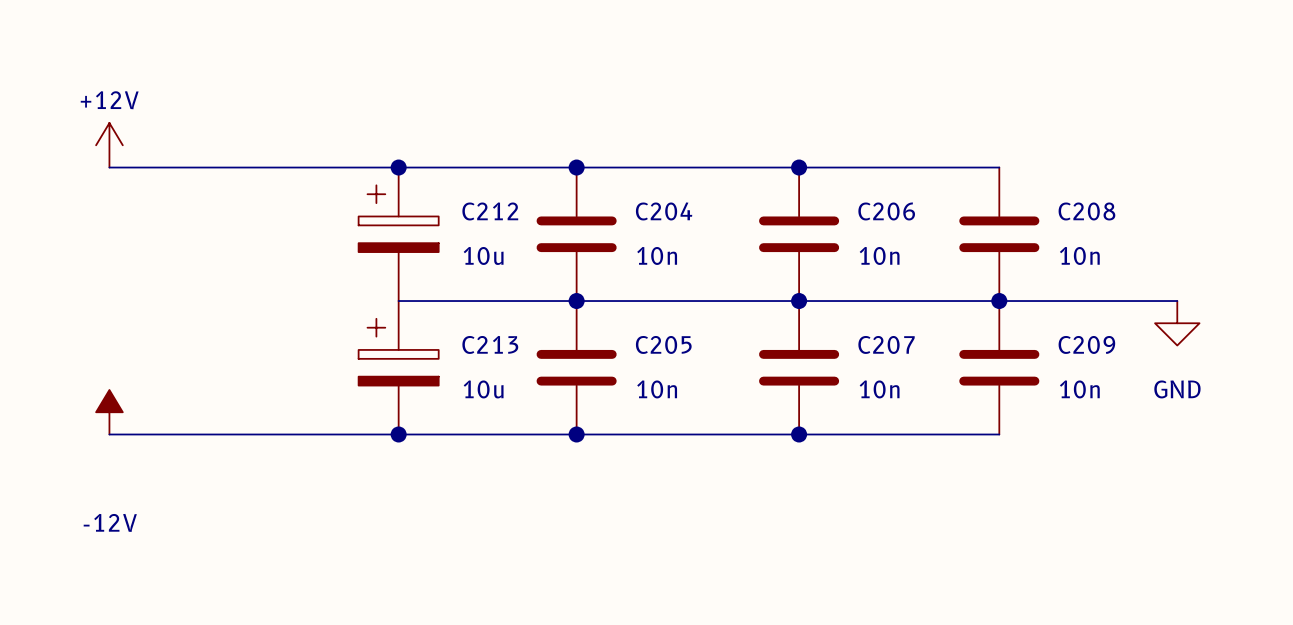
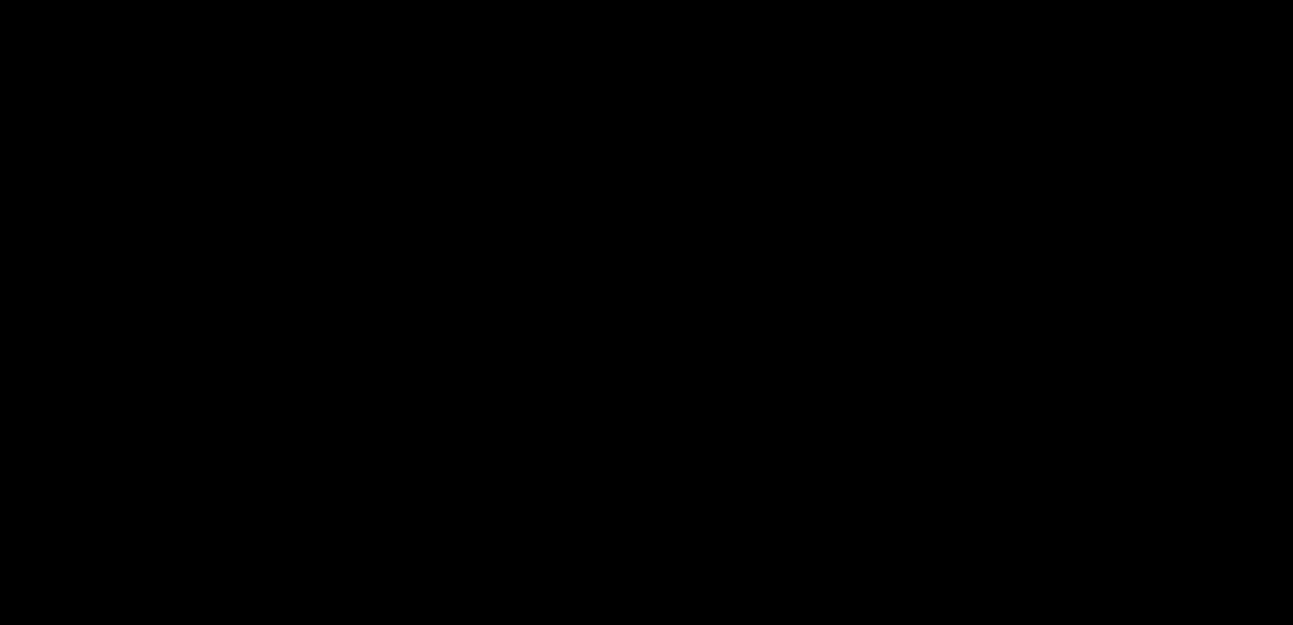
power symbol: +12V (109, 145) -> none
wire: (109, 167) (999, 167) -> none
junction: (398, 167) -> none
junction: (576, 167) -> none
junction: (799, 167) -> none
C212: 10u (398, 234) -> none
C204: 10n (576, 234) -> none
C206: 10n (799, 234) -> none
C208: 10n (999, 234) -> none
wire: (398, 301) (1177, 301) -> none
junction: (576, 301) -> none
junction: (799, 301) -> none
junction: (999, 301) -> none
power symbol: GND (1177, 323) -> none
C213: 10u (398, 367) -> none
C205: 10n (576, 367) -> none
C207: 10n (799, 367) -> none
C209: 10n (999, 367) -> none
power symbol: -12V (109, 412) -> none
wire: (109, 434) (999, 434) -> none
junction: (398, 434) -> none
junction: (576, 434) -> none
junction: (799, 434) -> none

